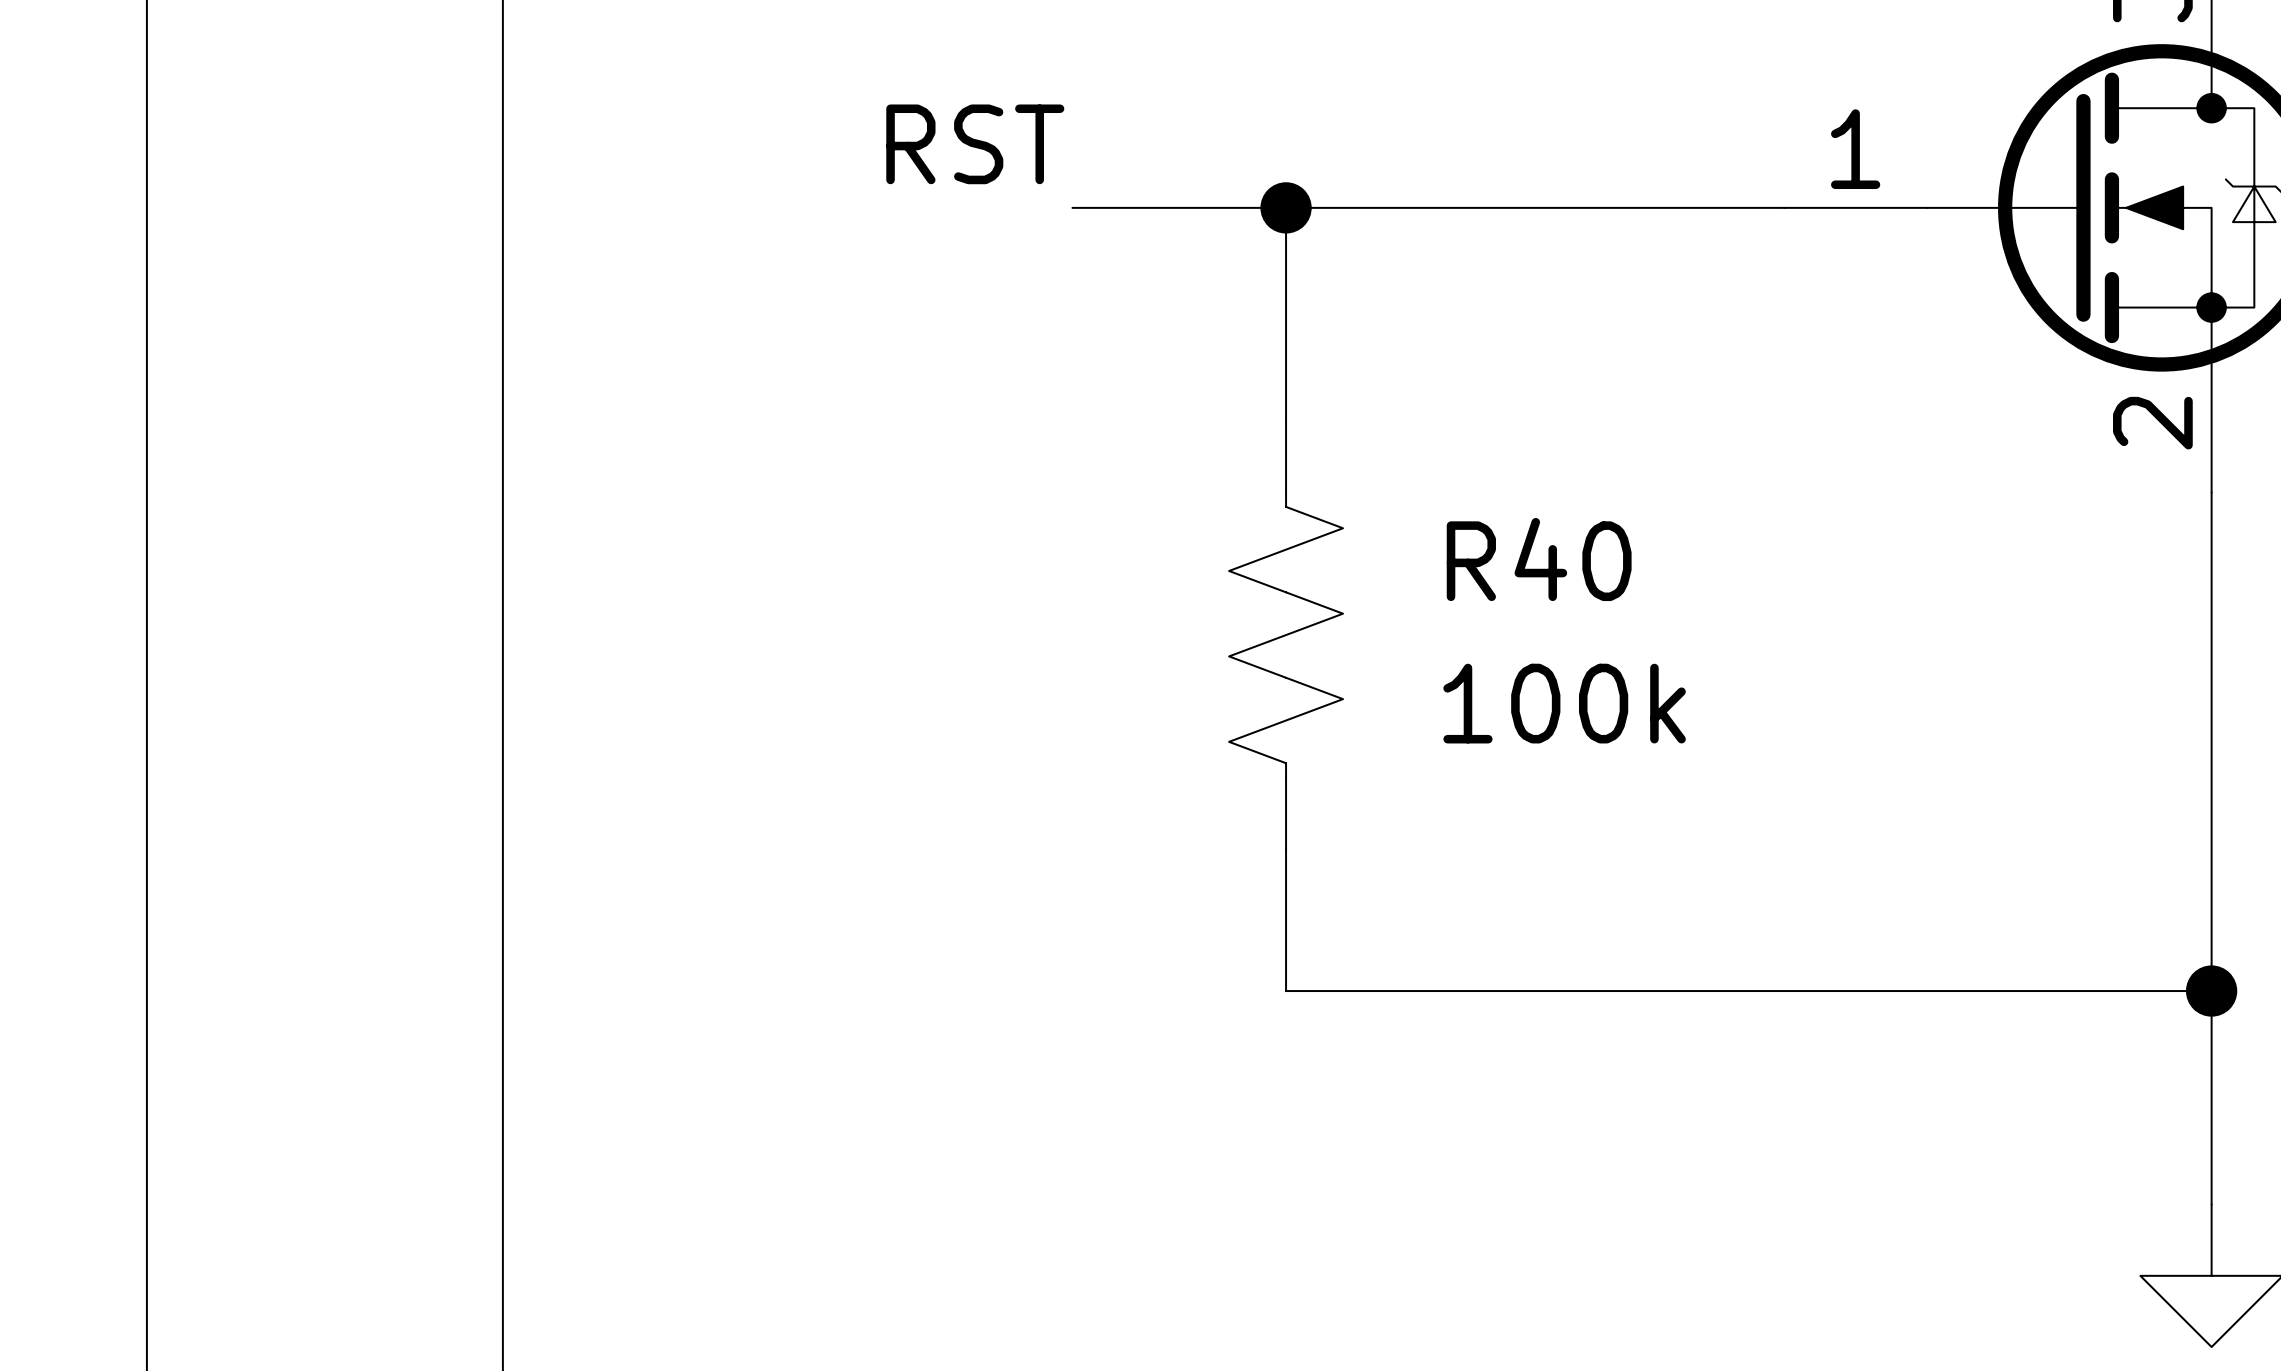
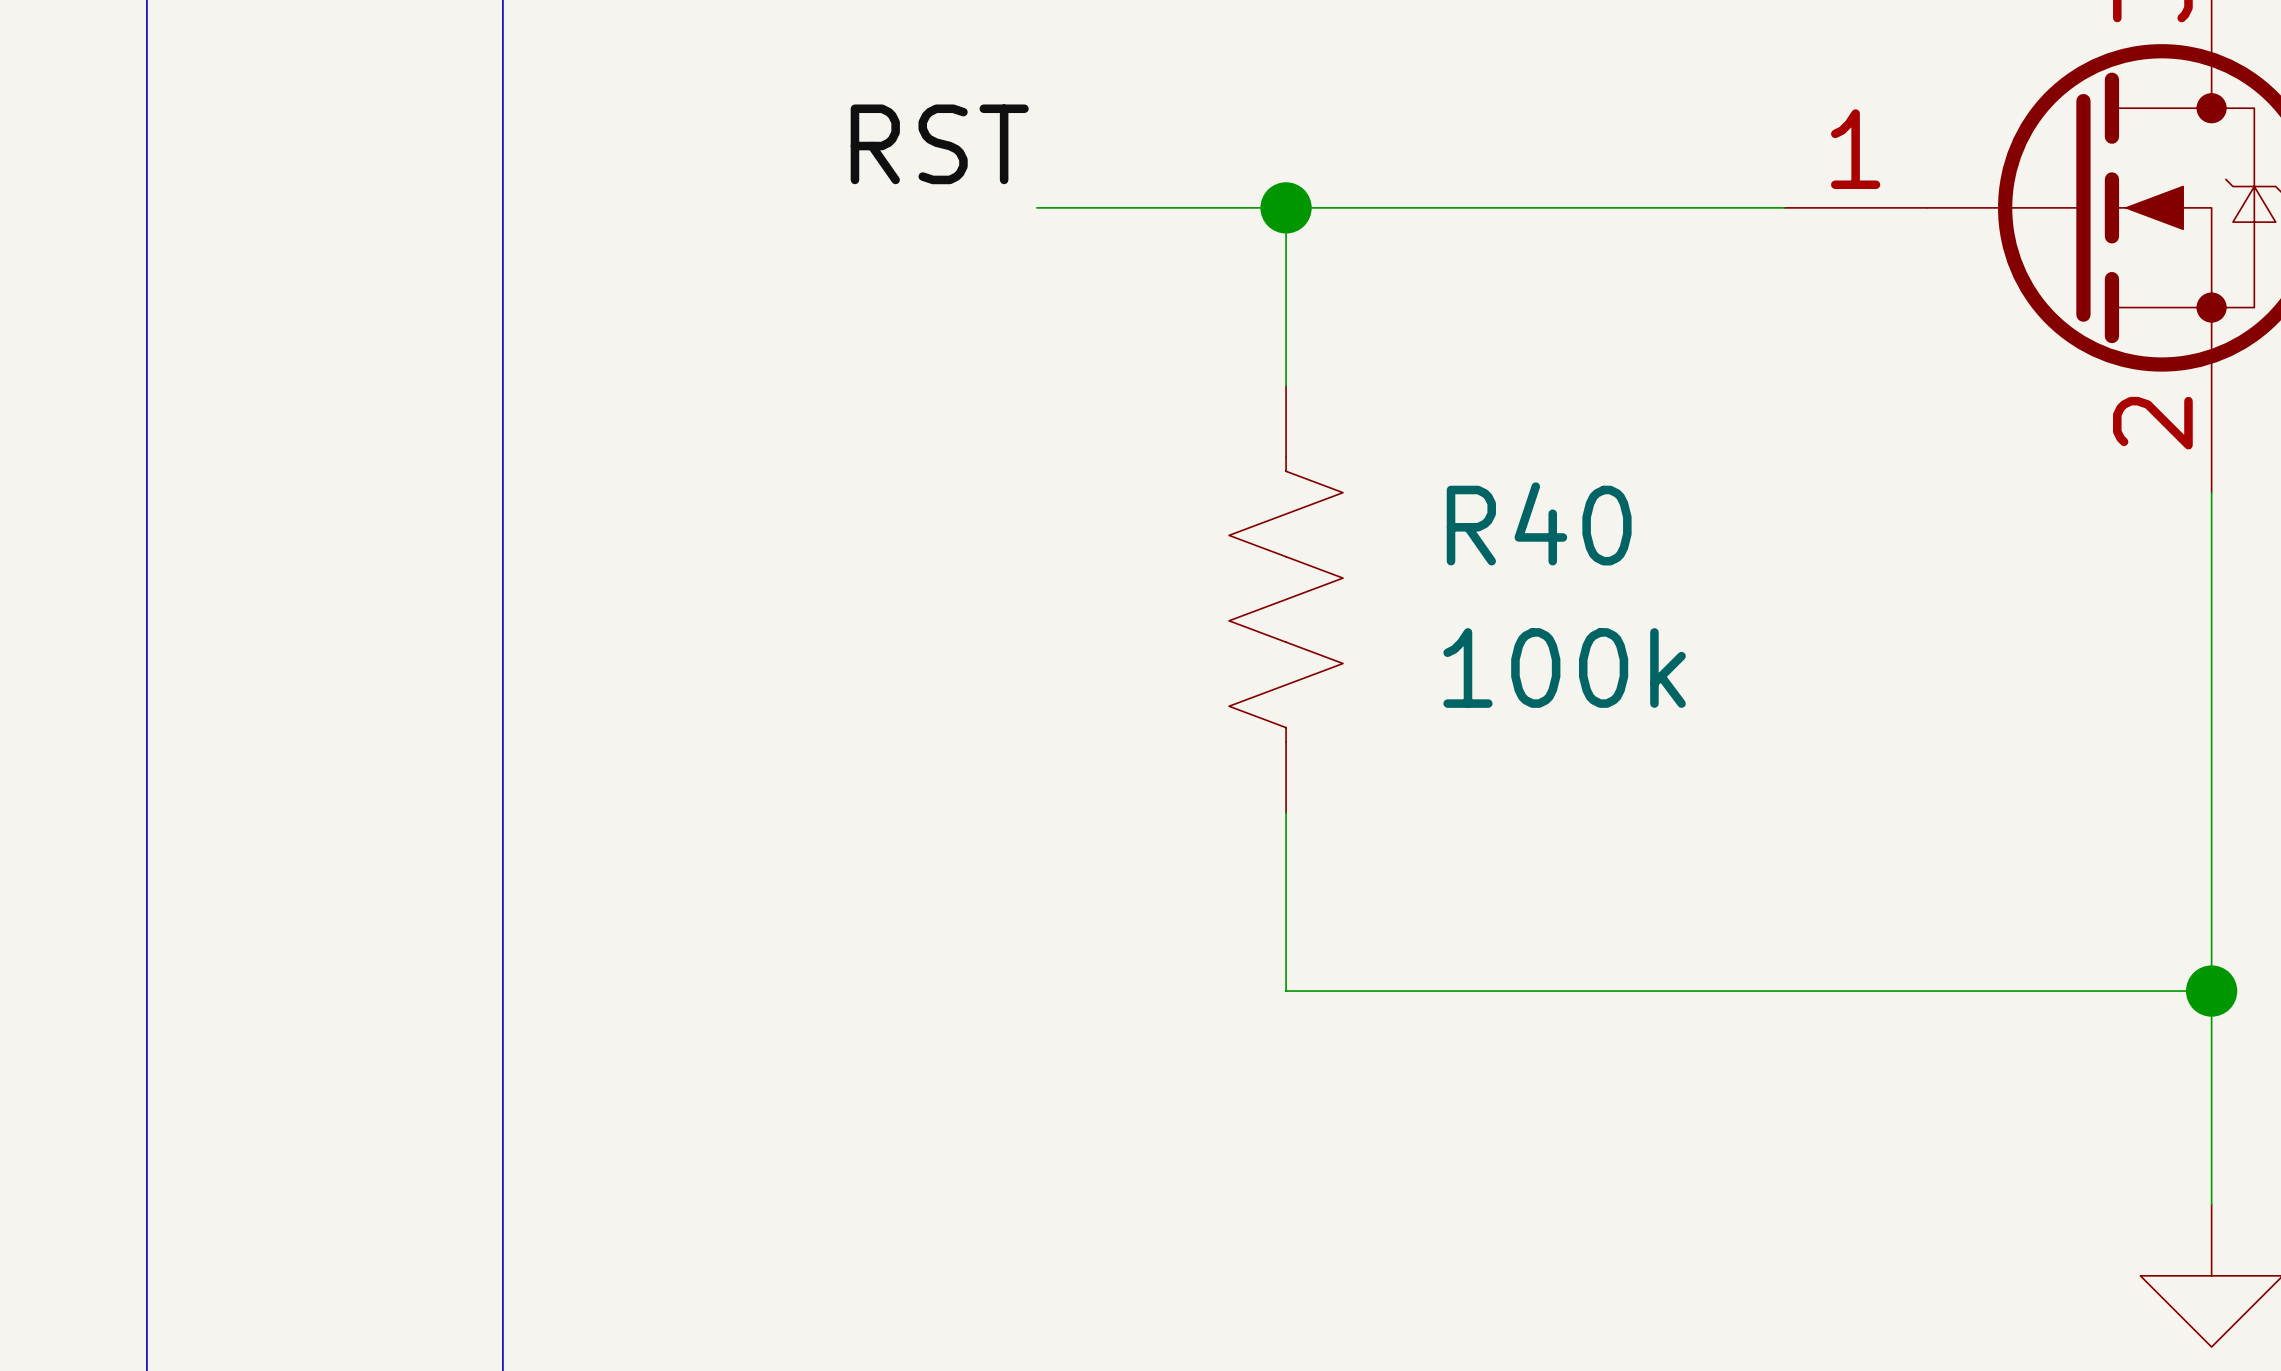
label position: RST (975, 144) -> RST (939, 144)
wire: none -> (1036, 207) (1072, 207)
R40 position: (1286, 635) -> (1286, 599)

